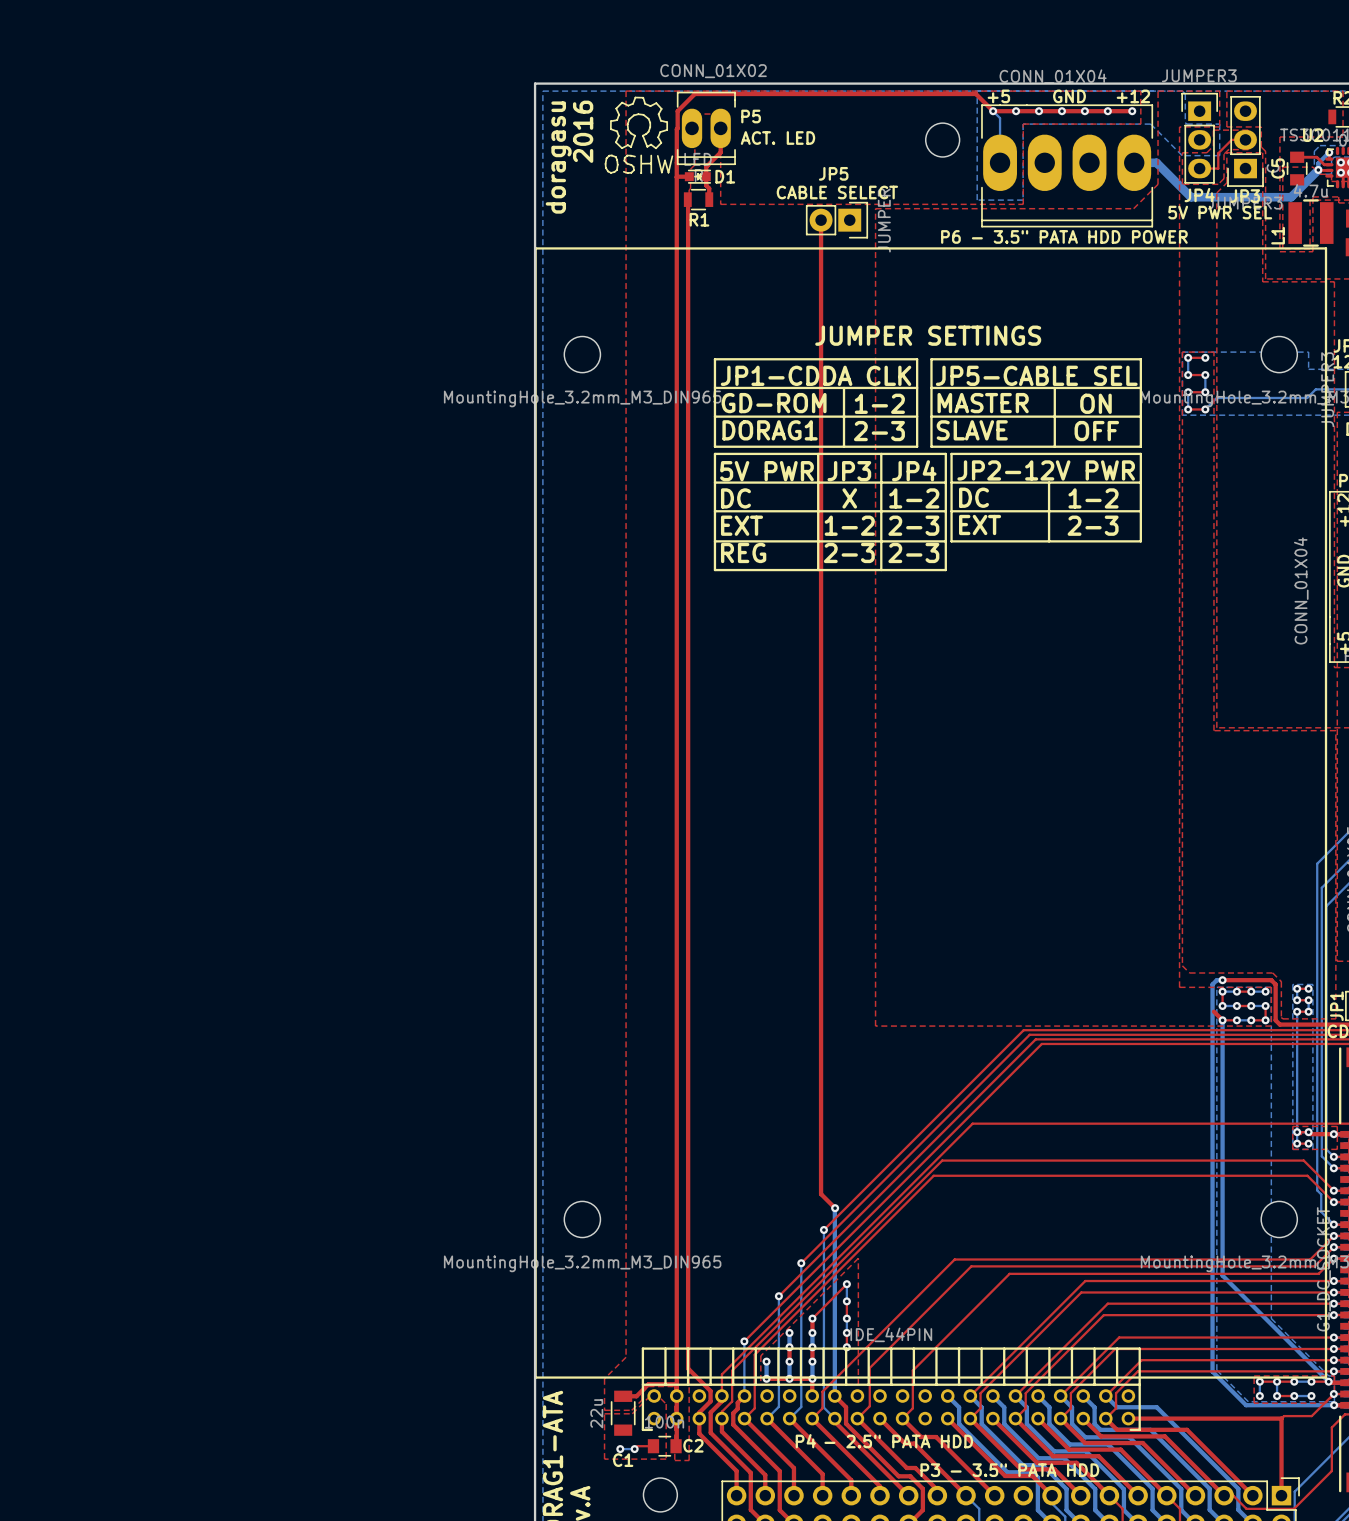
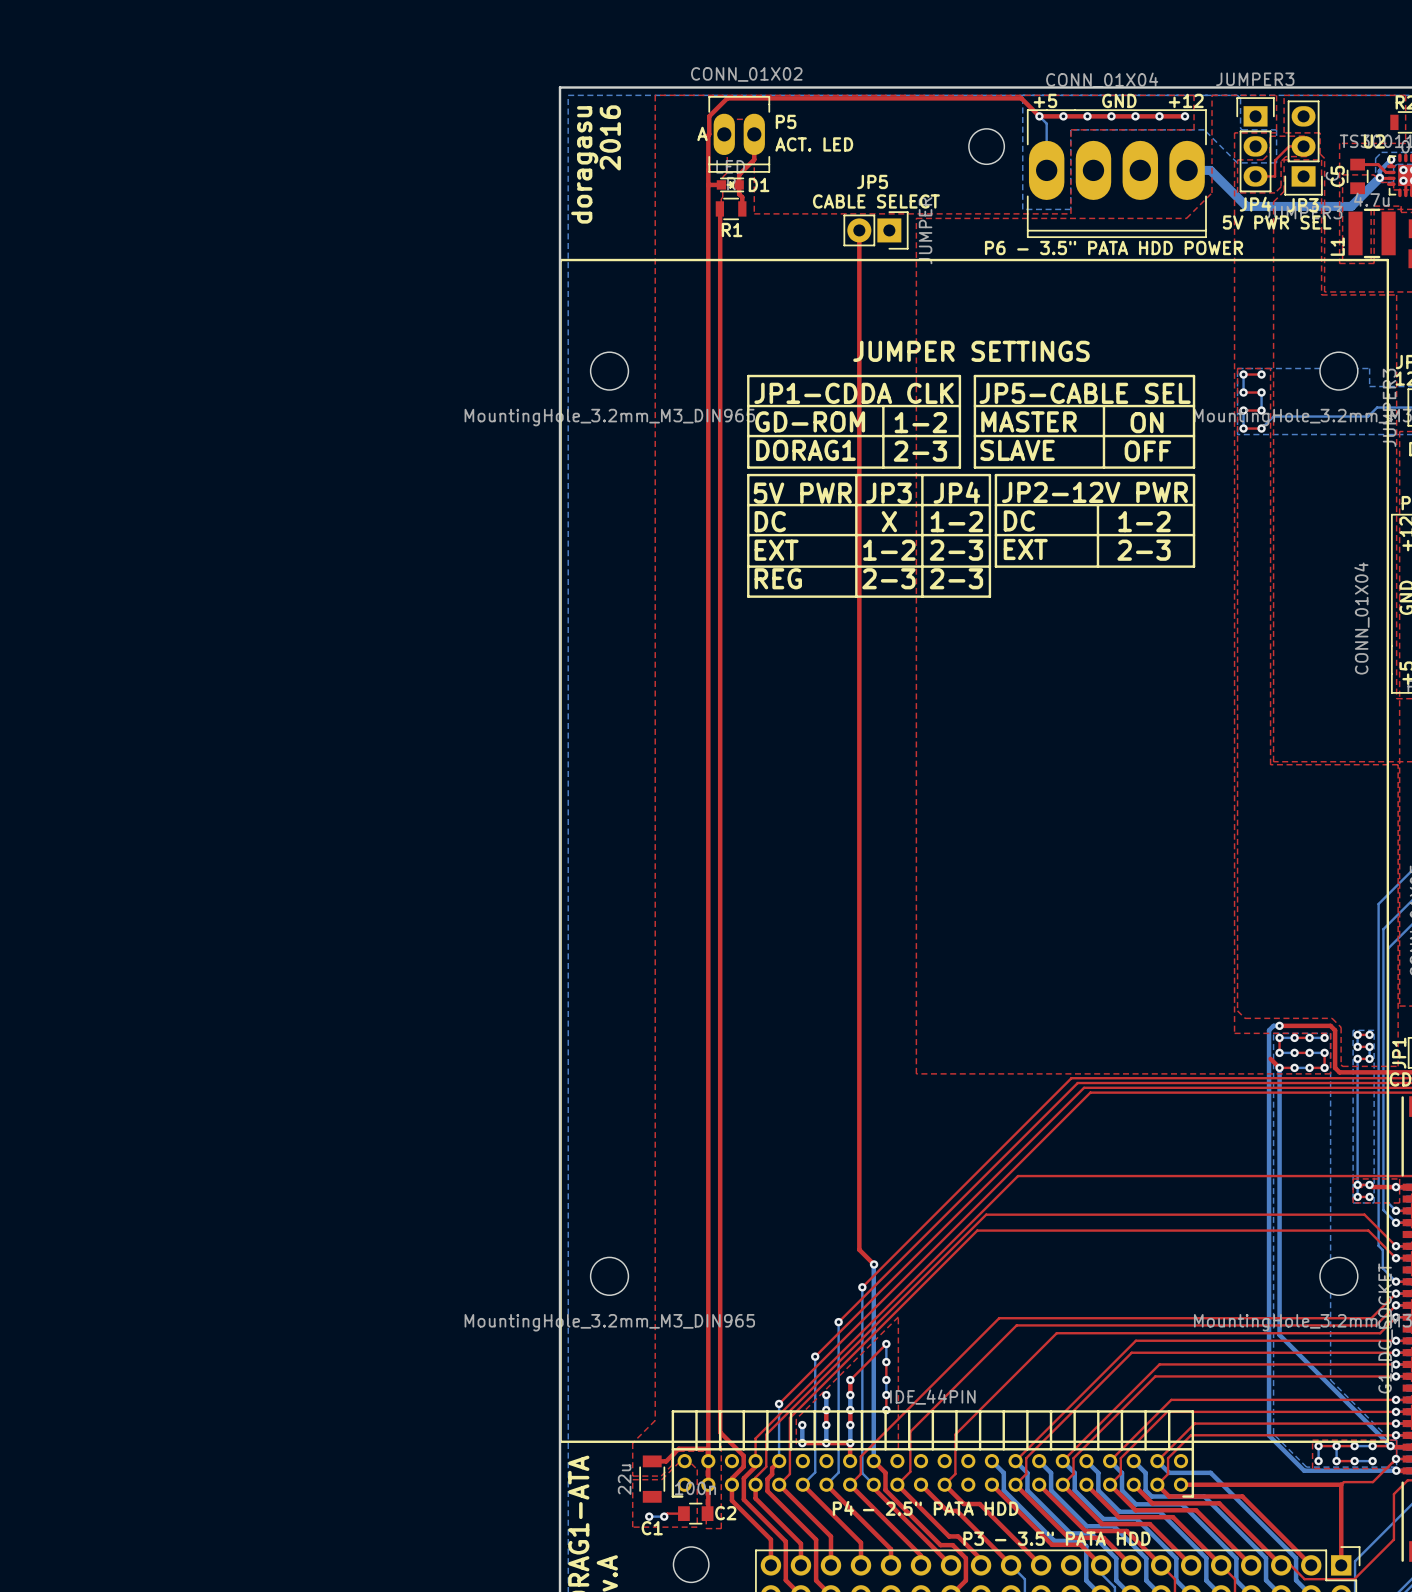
drawing: [604, 96, 674, 175] -> none
text: none -> A (702, 133)

